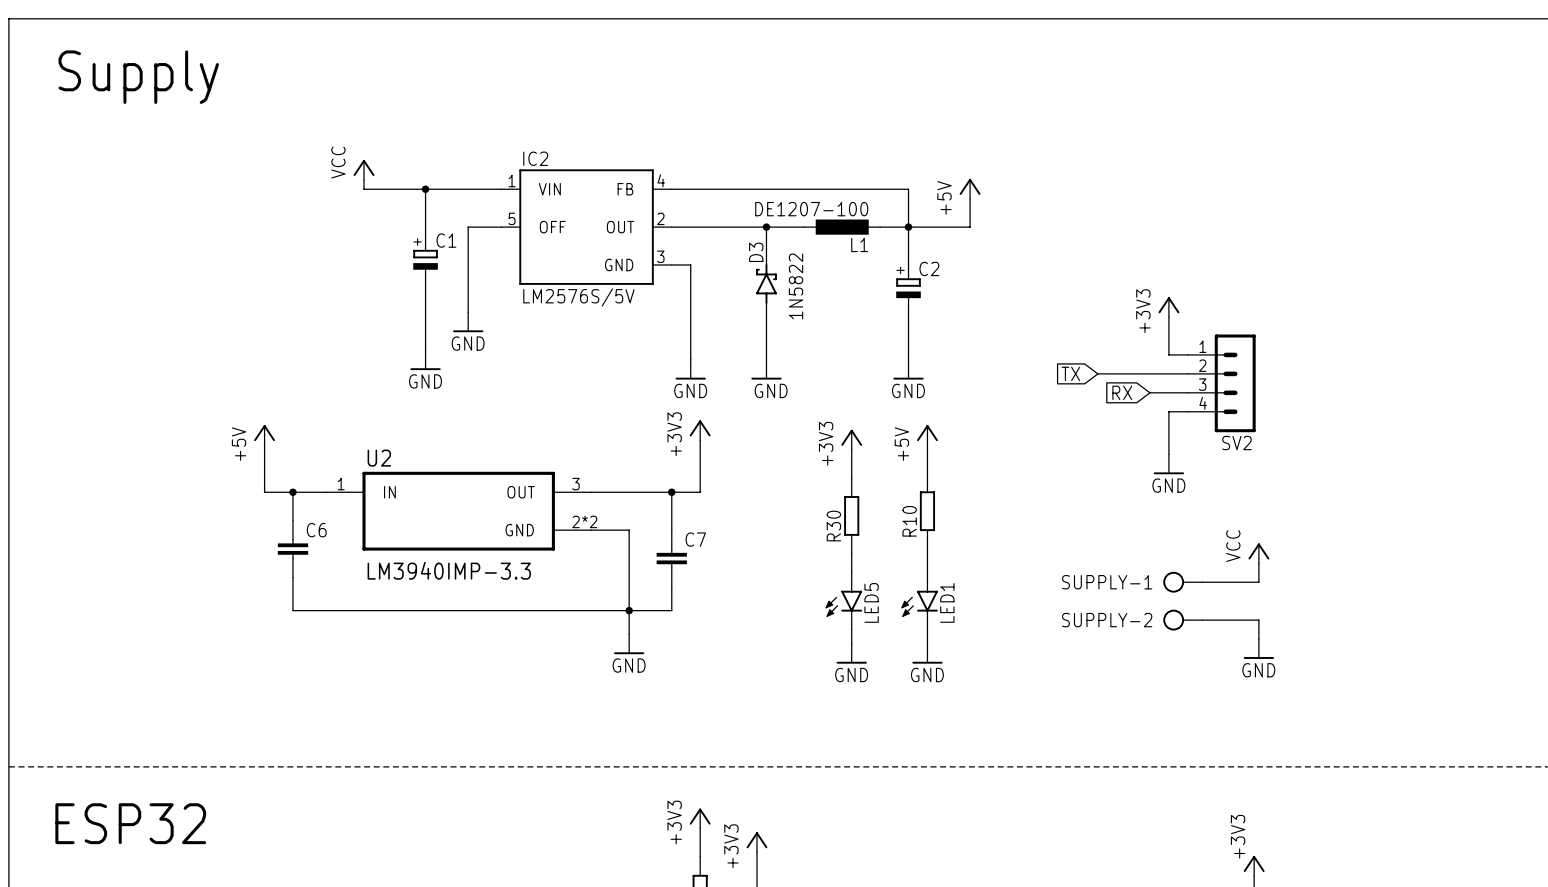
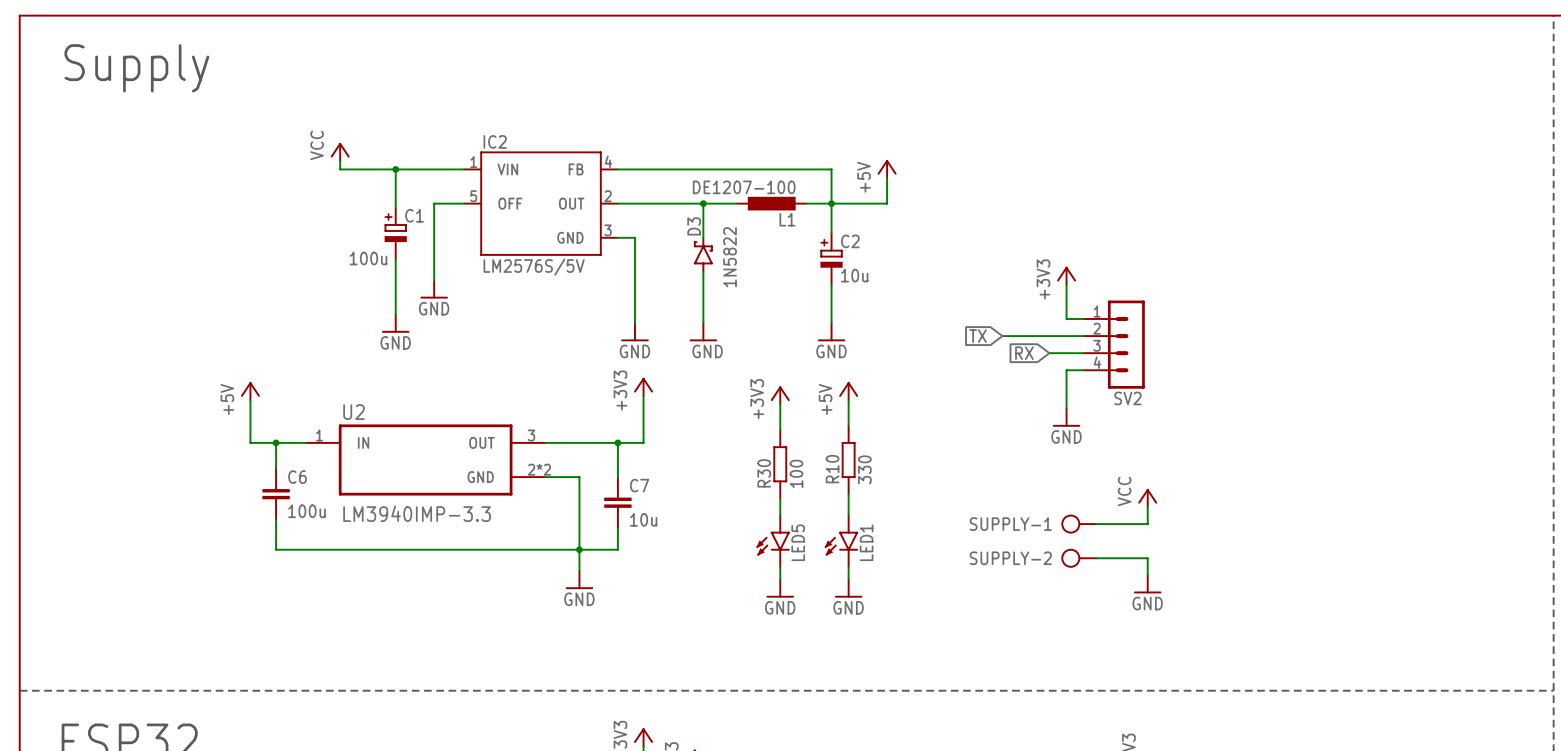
C1 value: none -> 100u (368, 258)
C2 value: none -> 10u (854, 275)
R10 value: none -> 330 (864, 469)
R30 value: none -> 100 (796, 473)
C6 value: none -> 100u (306, 511)
C7 value: none -> 10u (643, 519)

